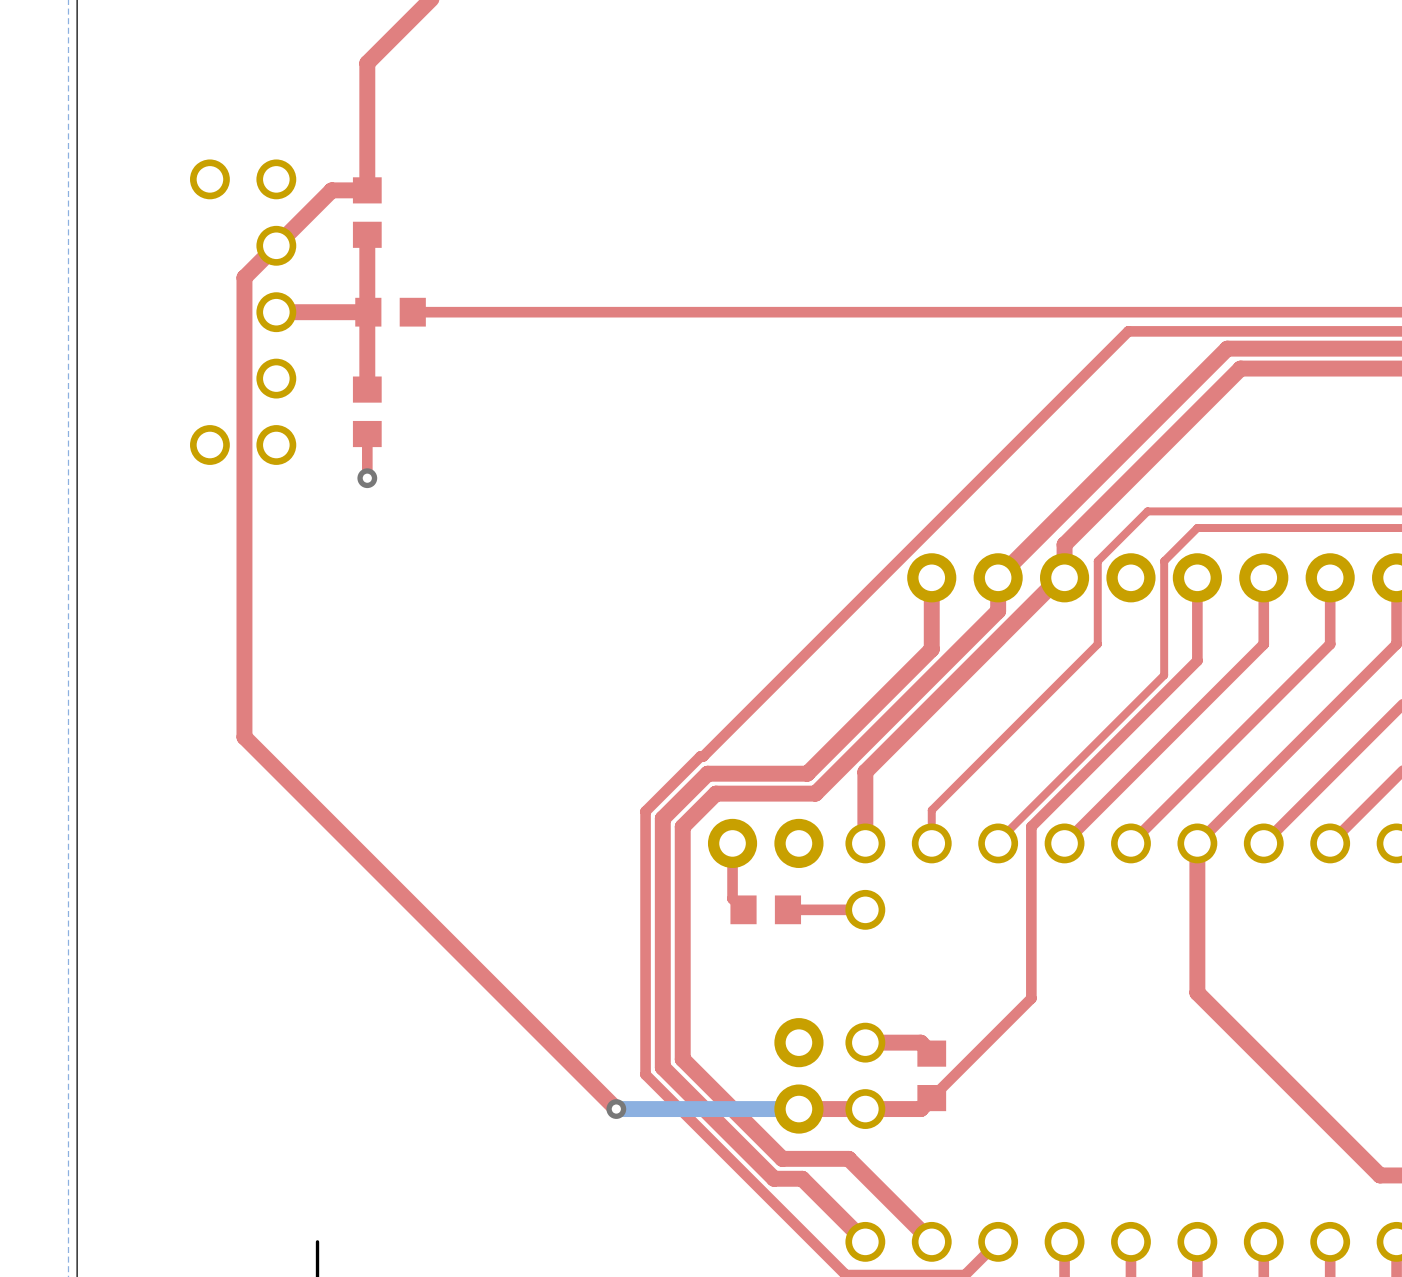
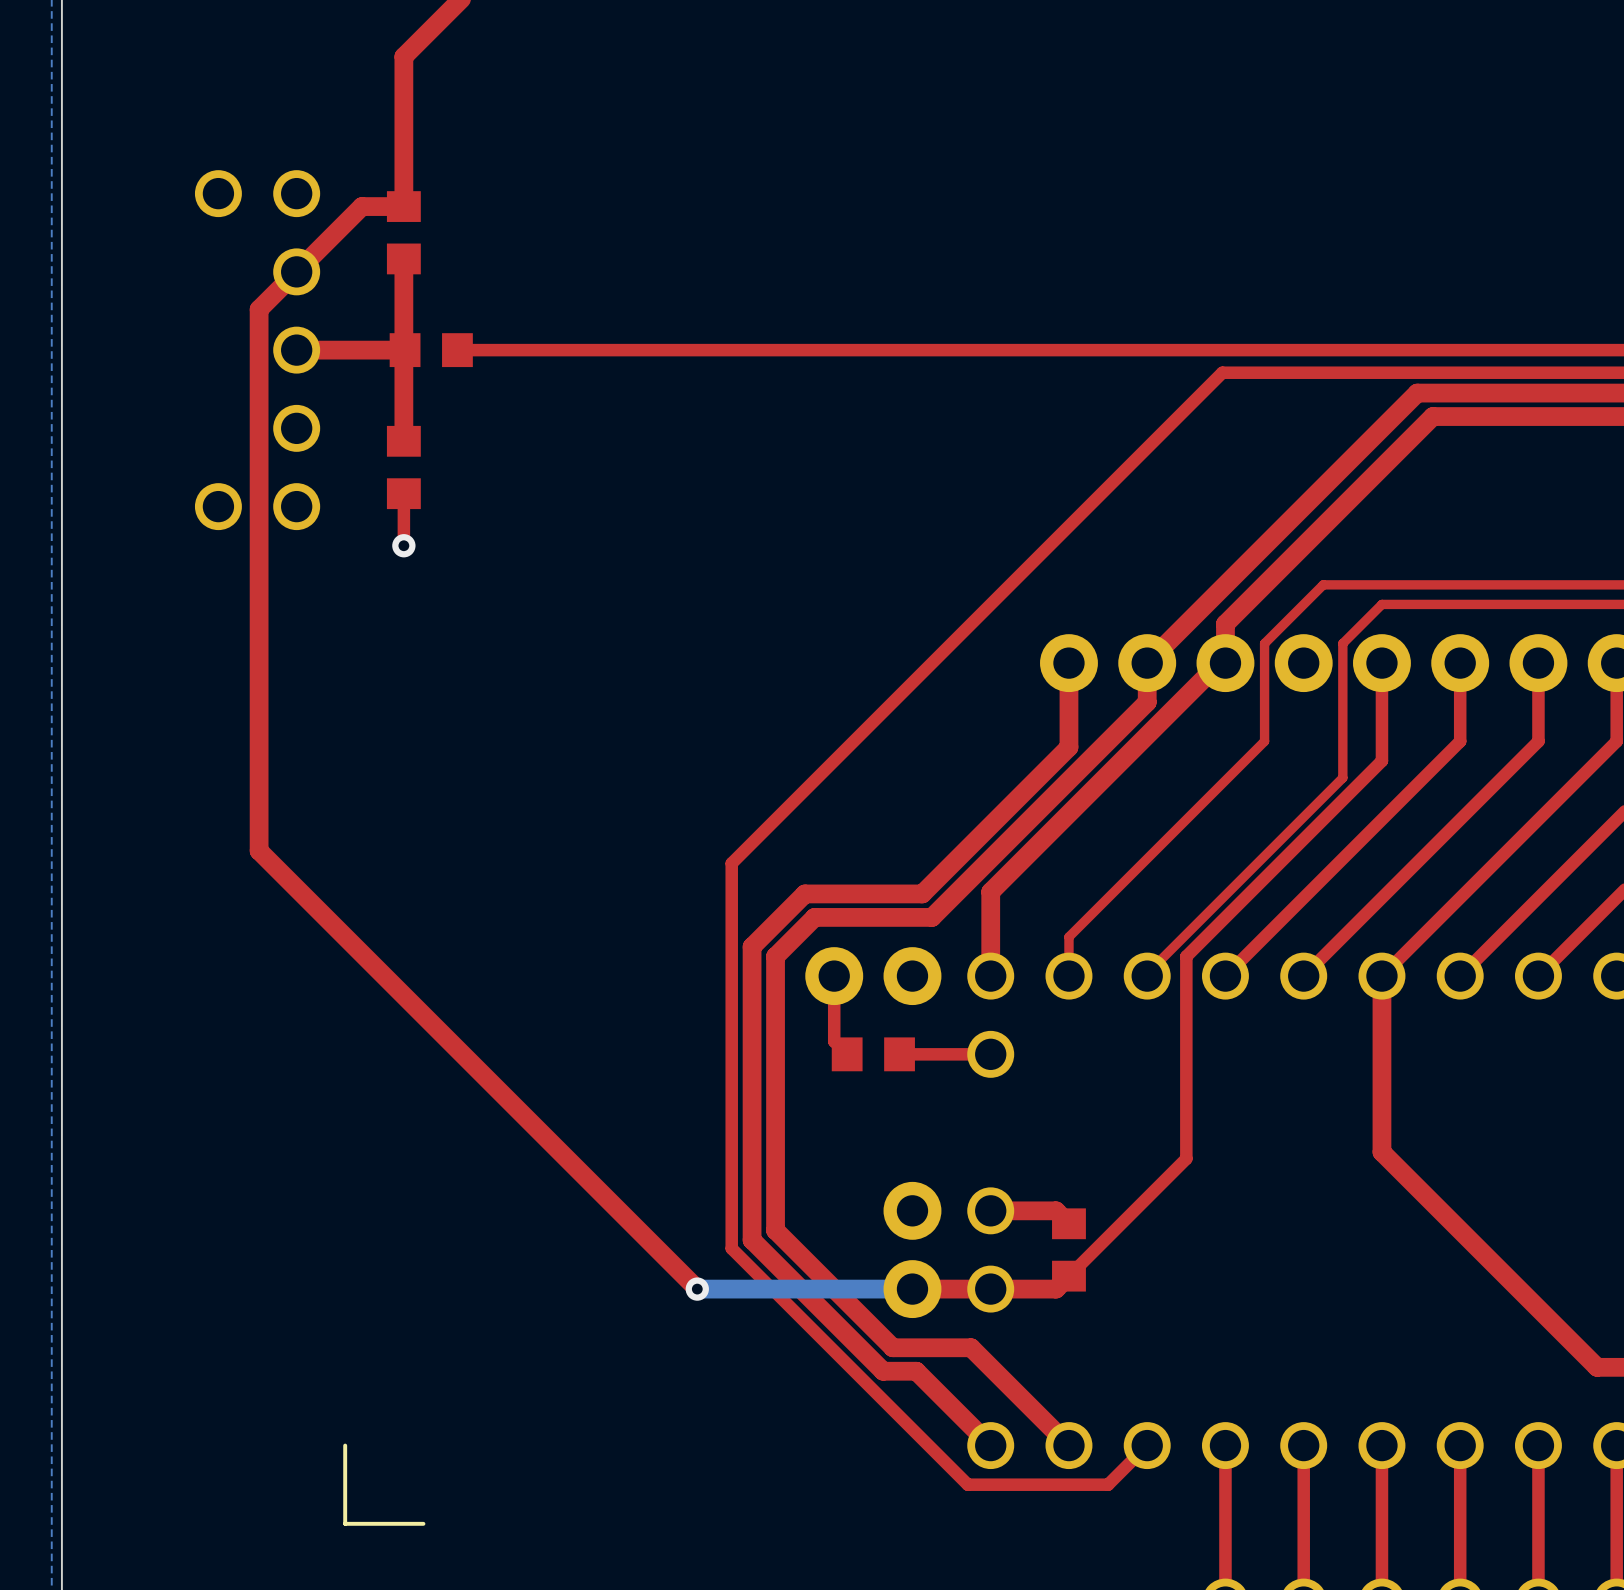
top track: (1128, 331) (703, 756) (700, 756) (645, 811) -> (1300, 372) (1222, 372) (731, 863) (731, 938)

